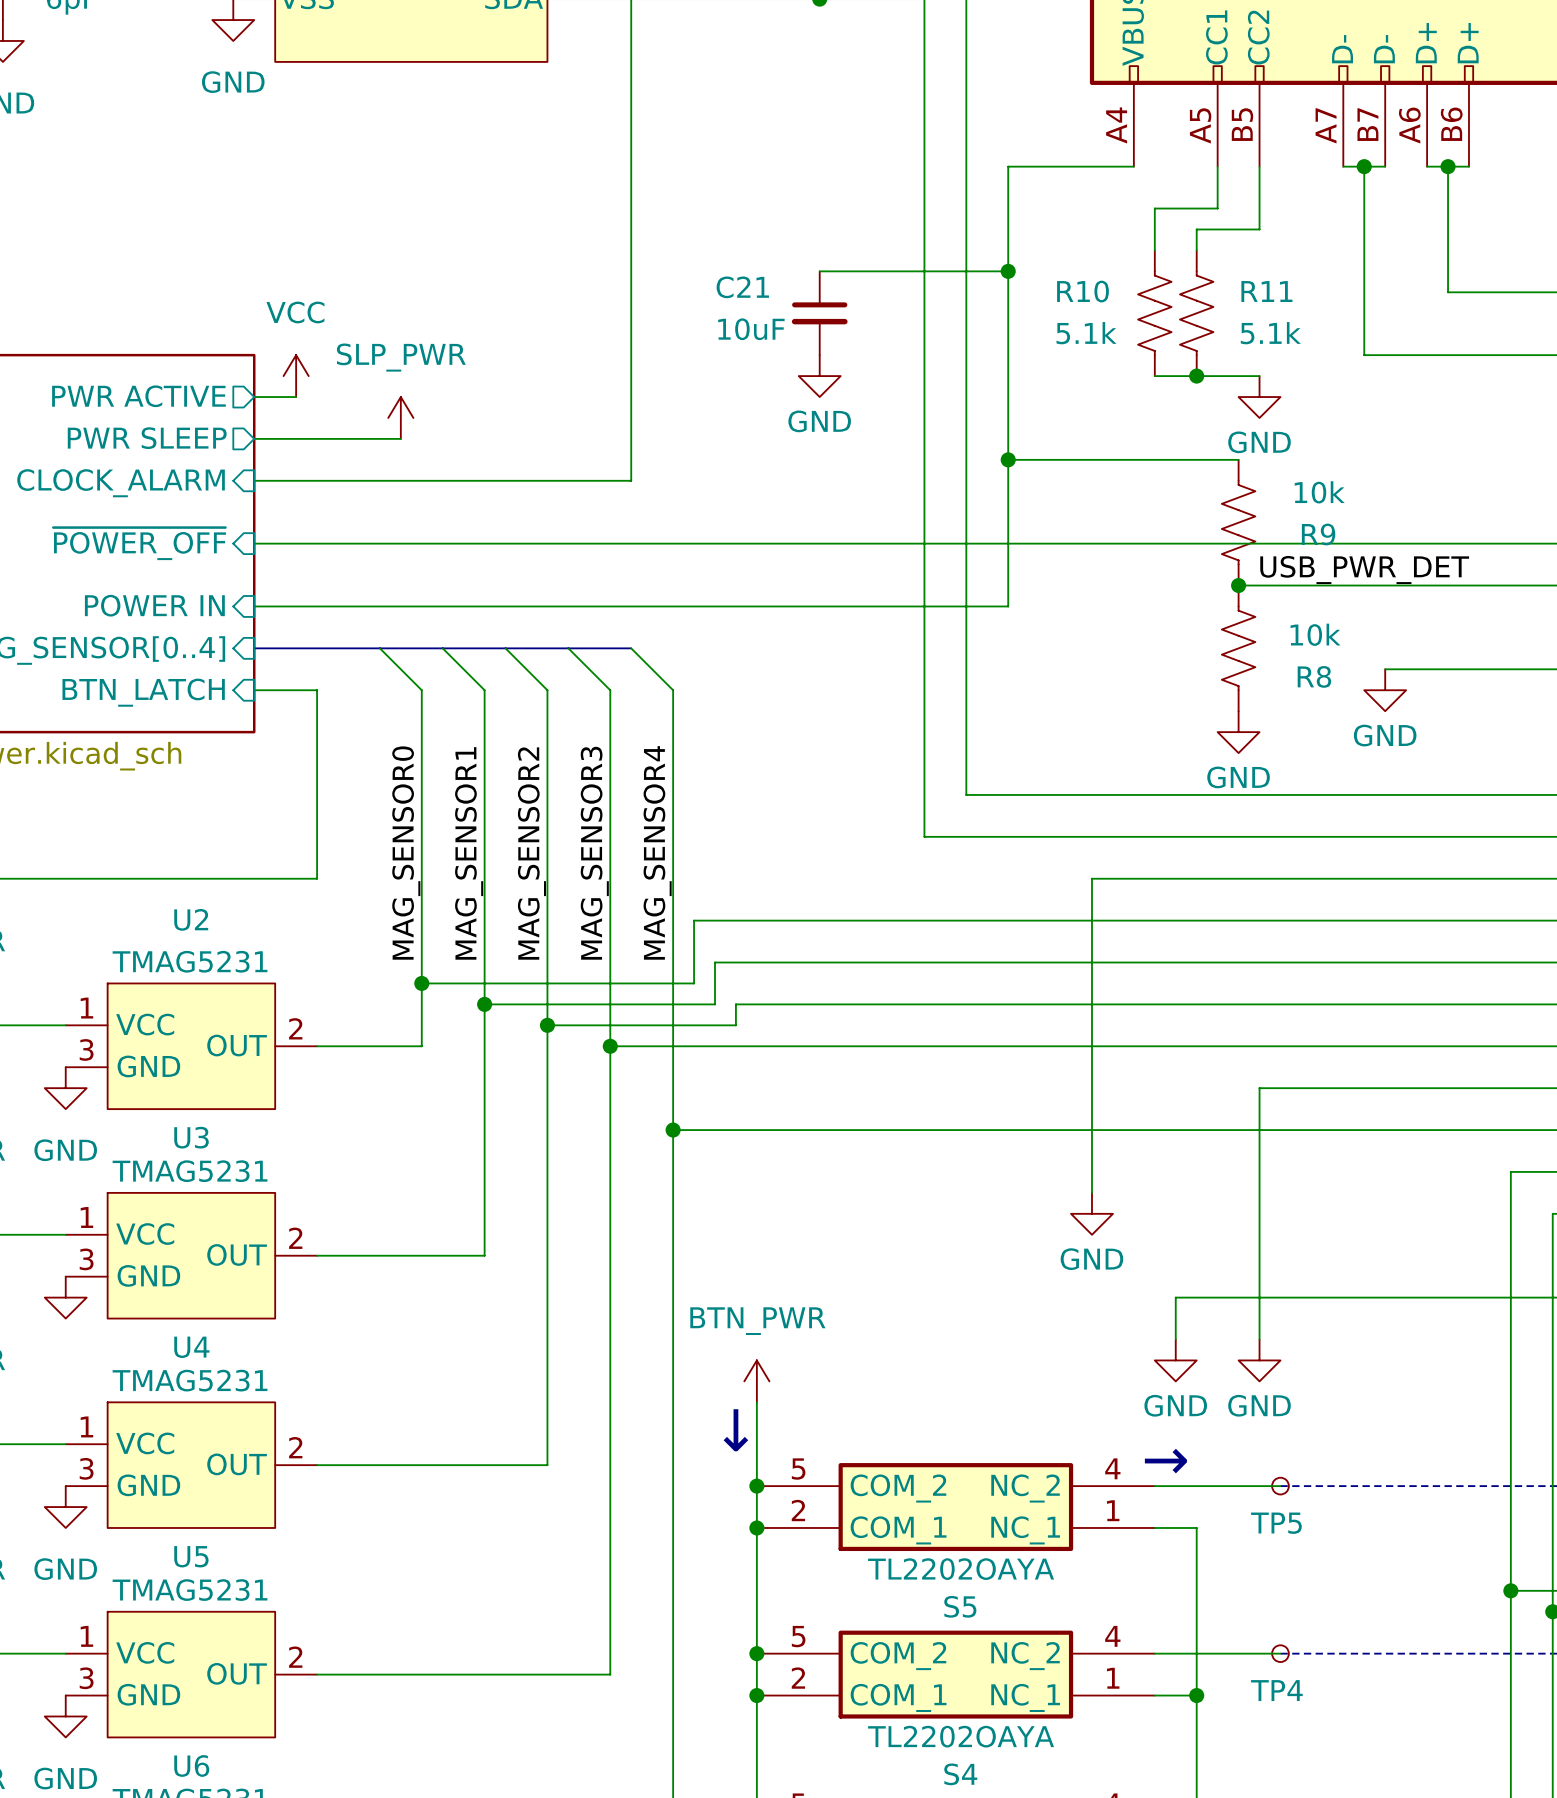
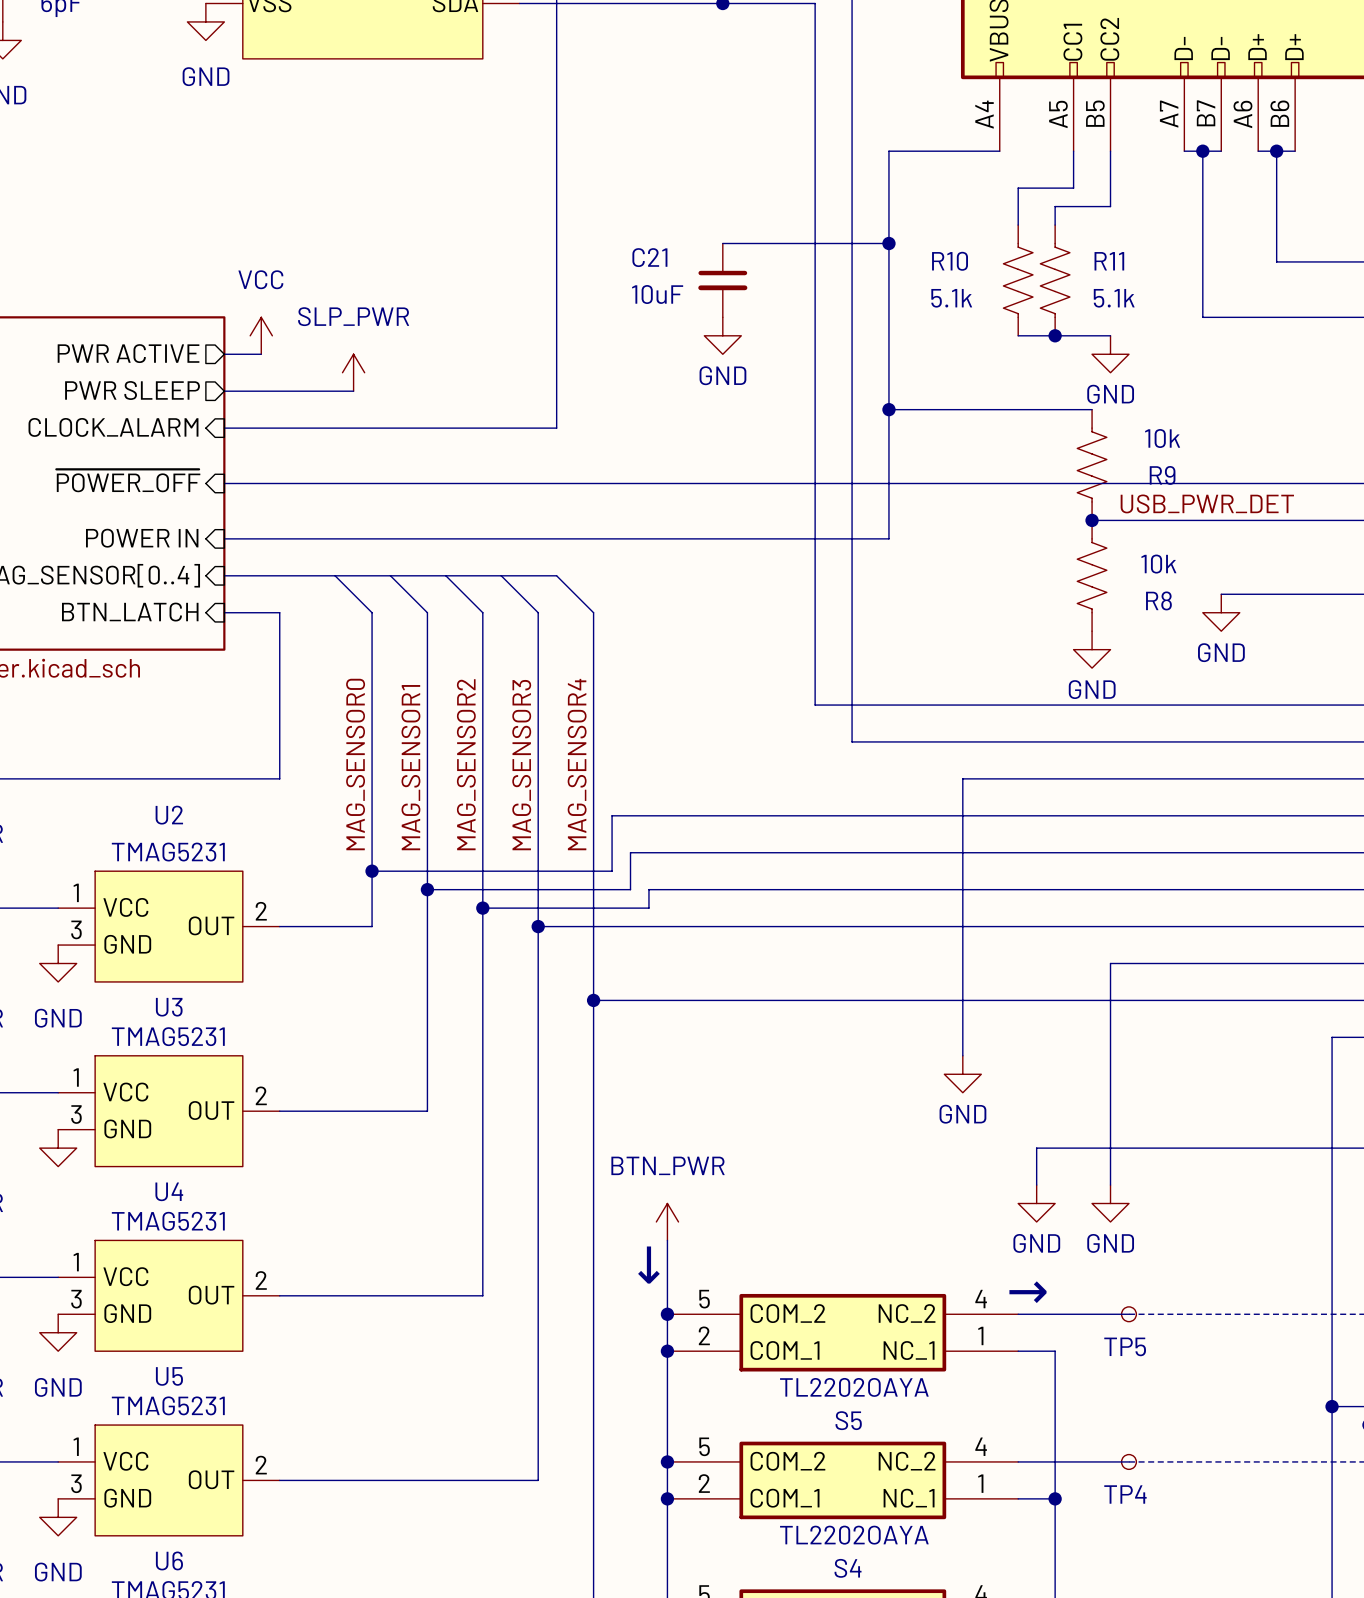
wire: (924, 794) (924, 836) (966, 836) -> (815, 705) (852, 705) (852, 741)

